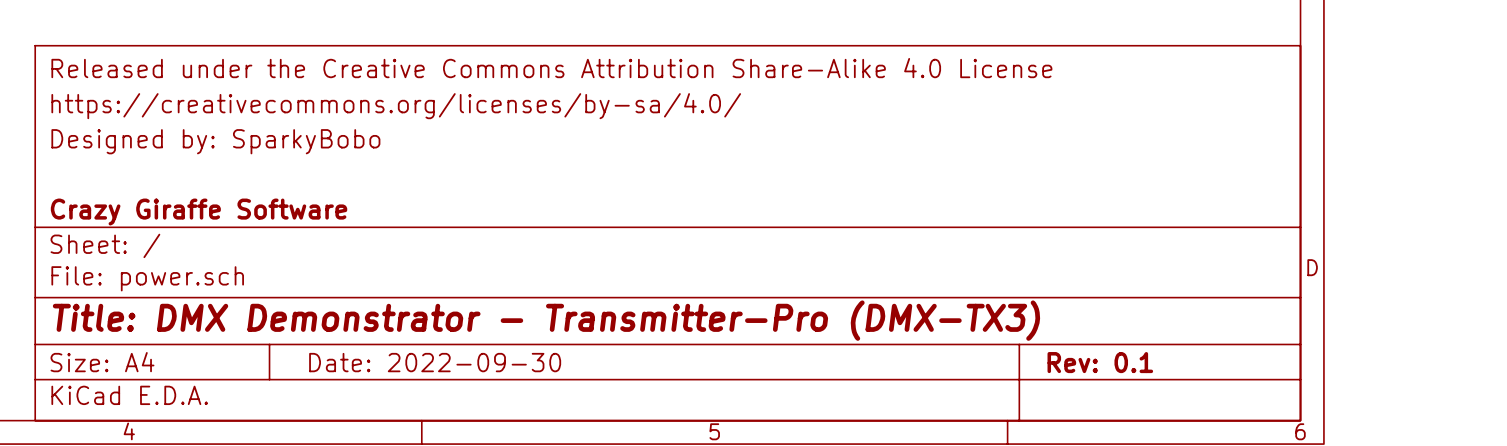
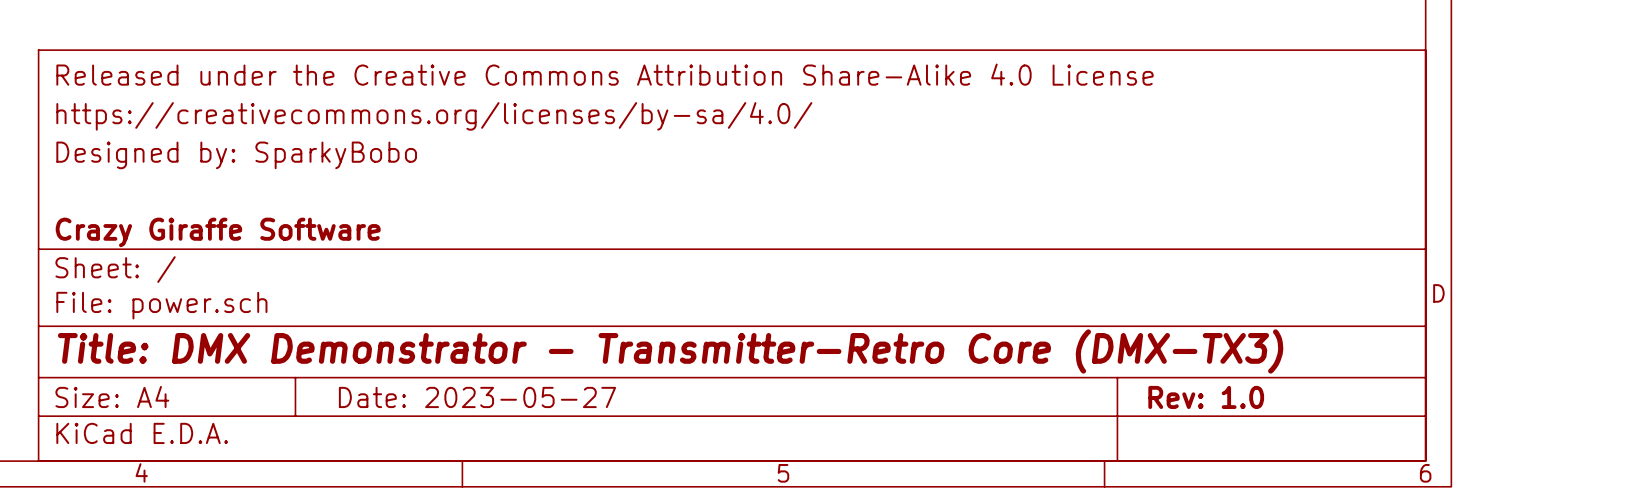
title block: Title: DMX Demonstrator - Transmitter-Pro (DMX-TX3) (546, 320) -> Title: DMX Demonstrator - Transmitter-Retro Core (DMX-TX3) (670, 351)
title block: Date: 2022-09-30 (435, 362) -> Date: 2023-05-27 (477, 397)
title block: Rev: 0.1 (1100, 362) -> Rev: 1.0 (1206, 397)

